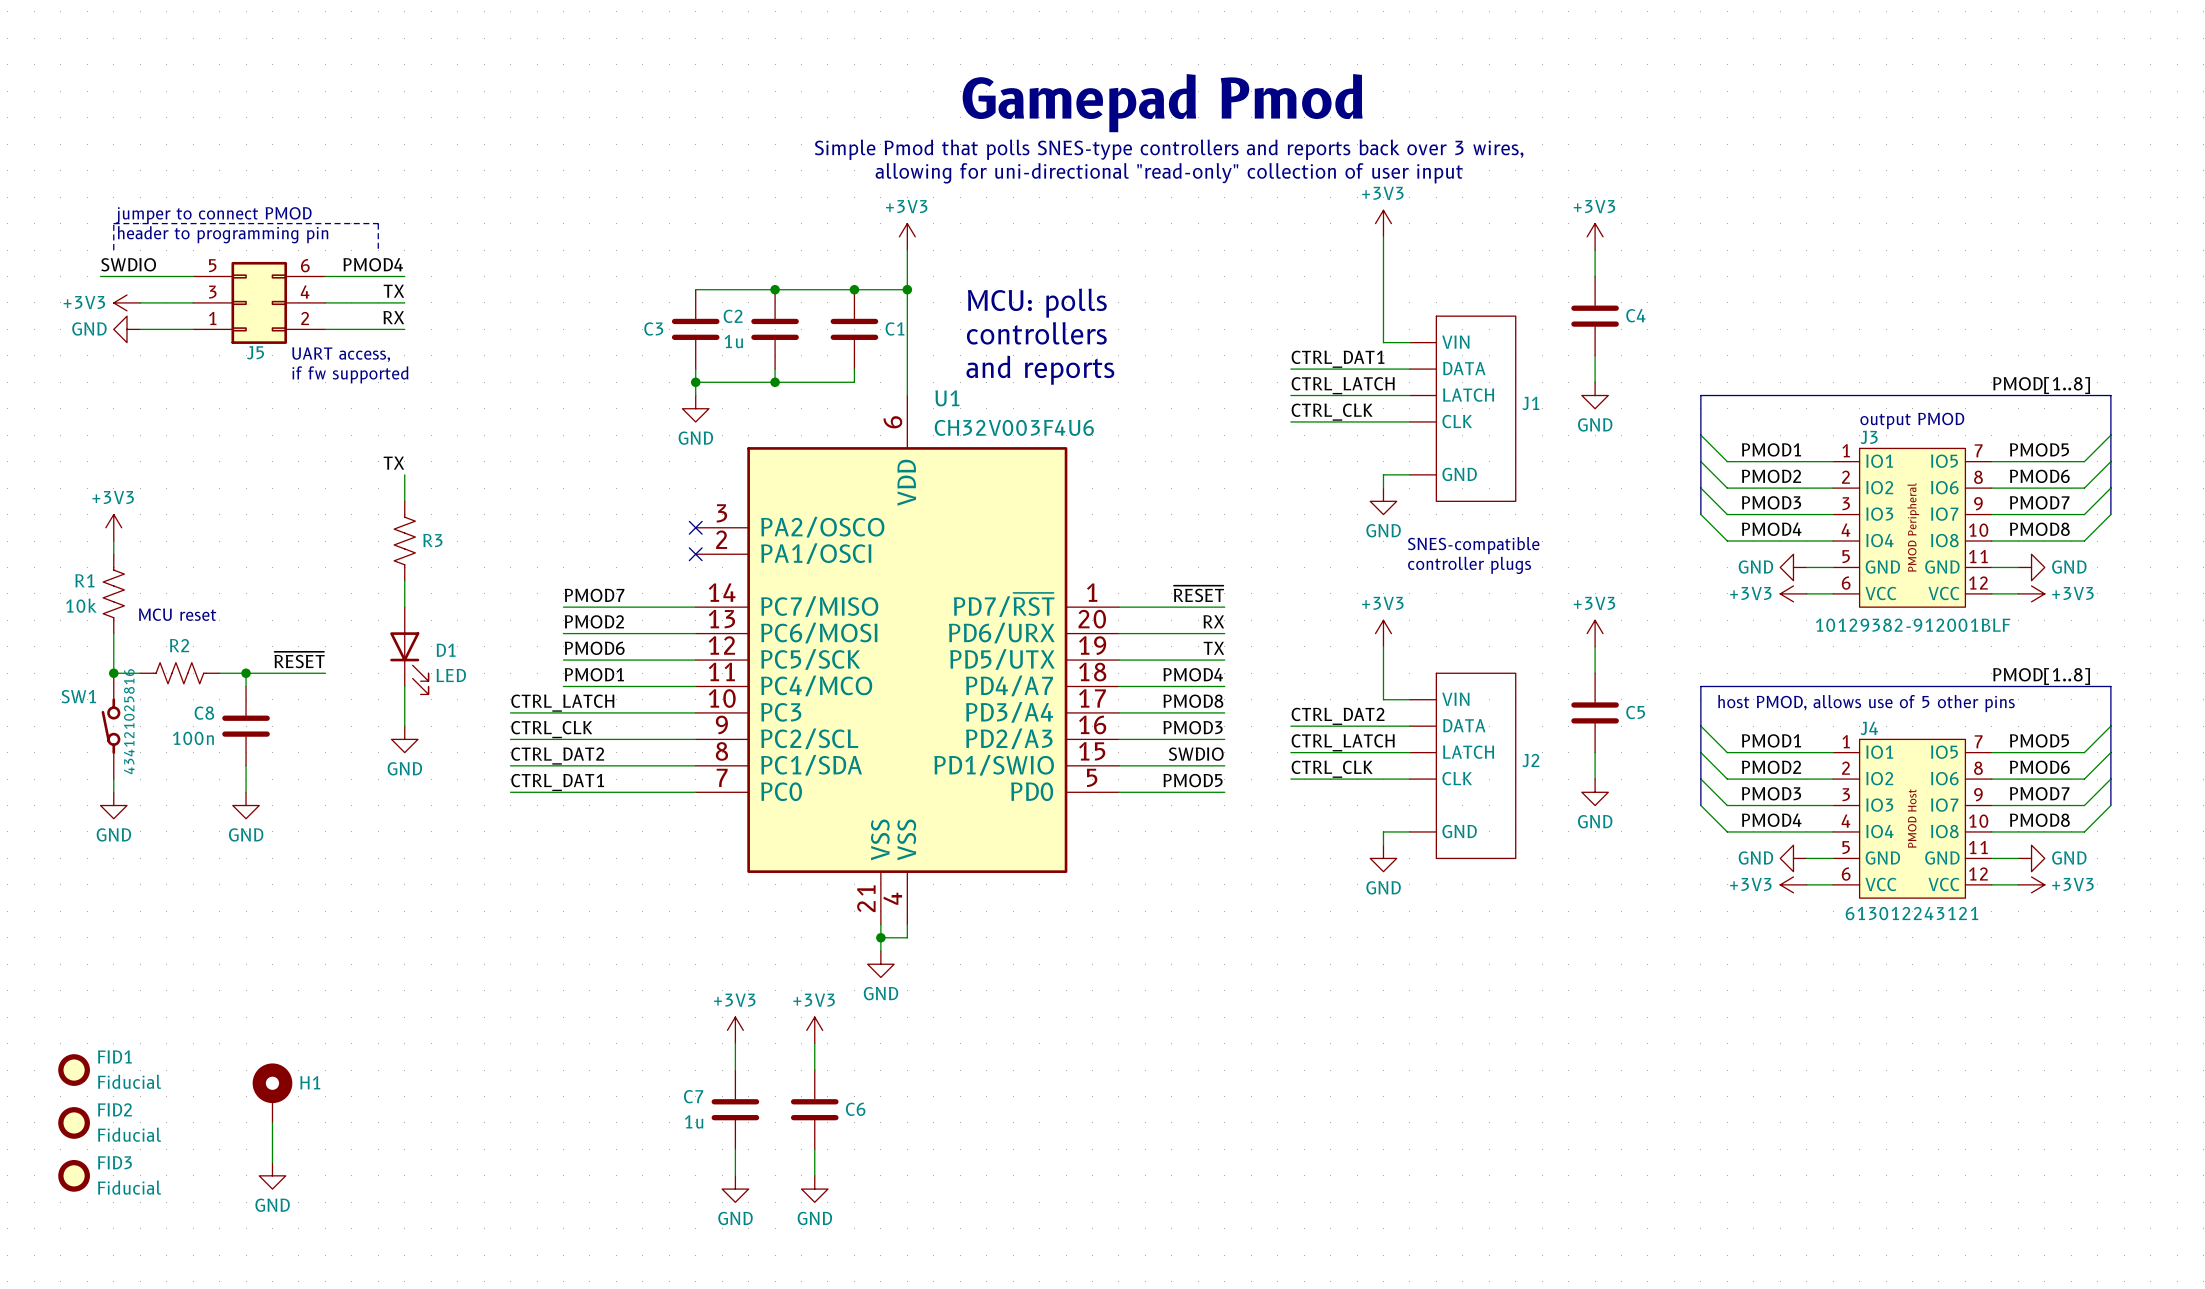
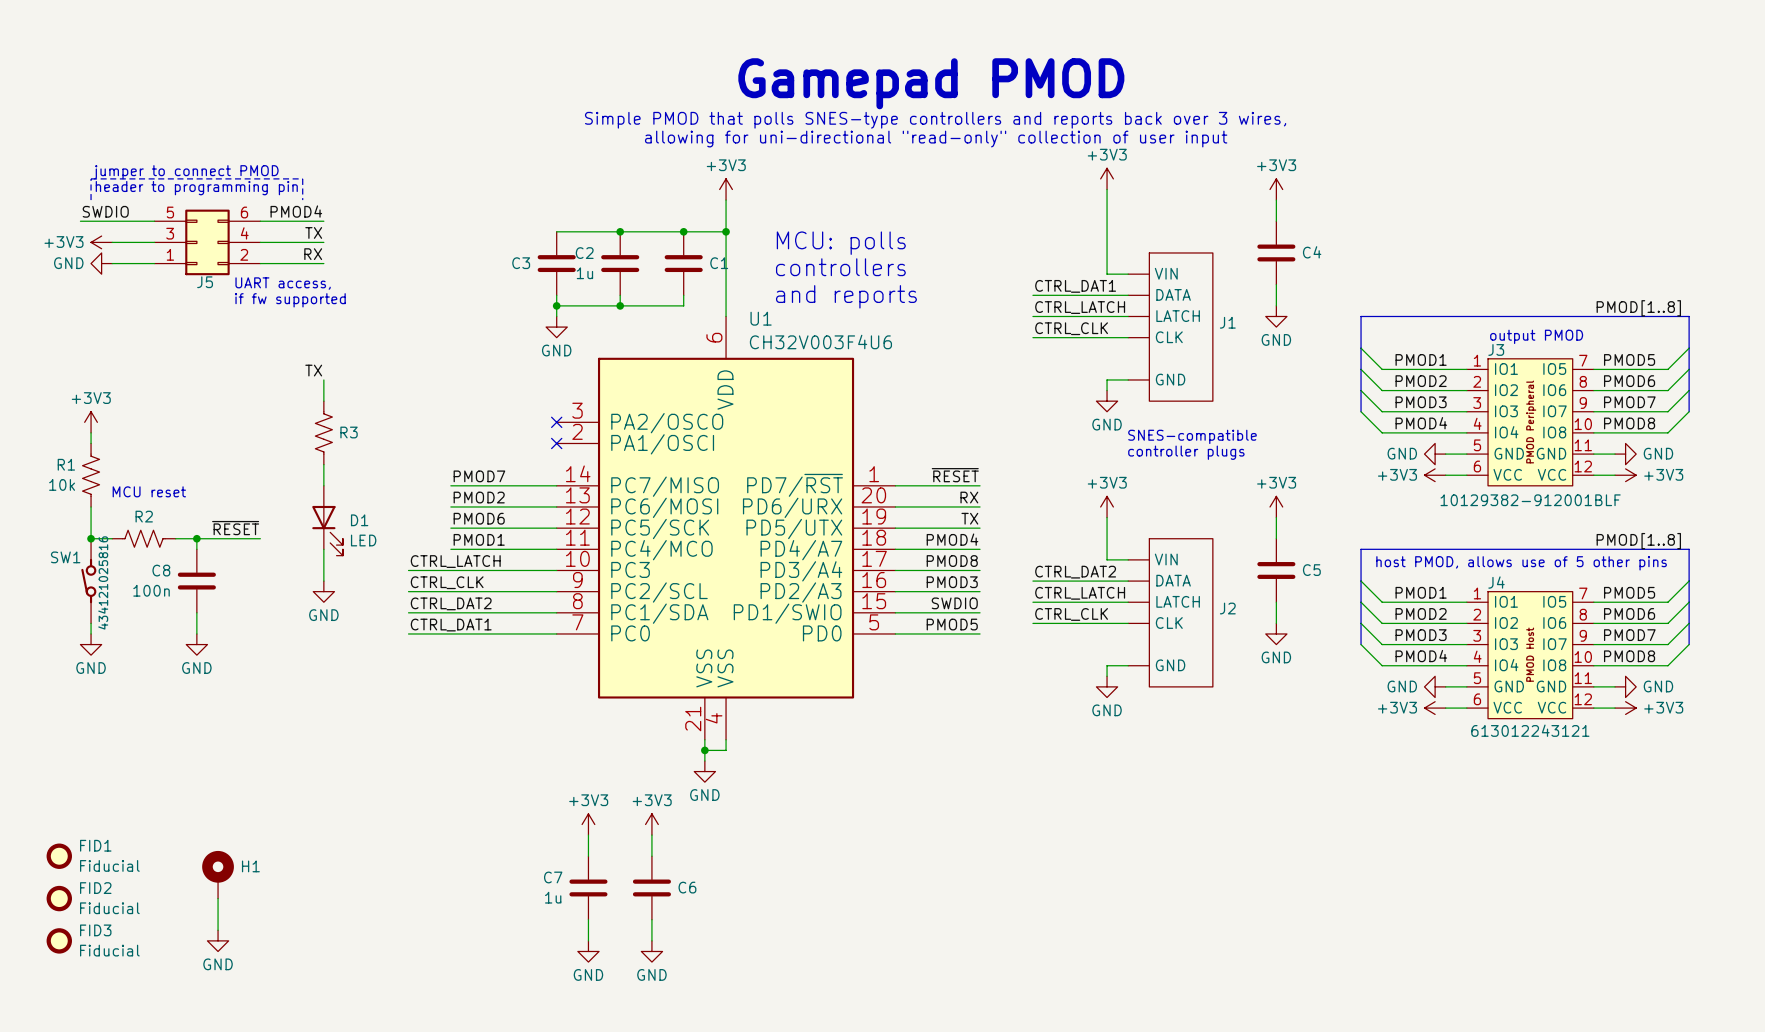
text: Gamepad Pmod (1162, 103) -> Gamepad PMOD (931, 83)
text: Simple Pmod that polls SNES-type controllers and reports back over 3 wires, (1169, 149) -> Simple PMOD that polls SNES-type controllers and reports back over 3 wires, (935, 120)

